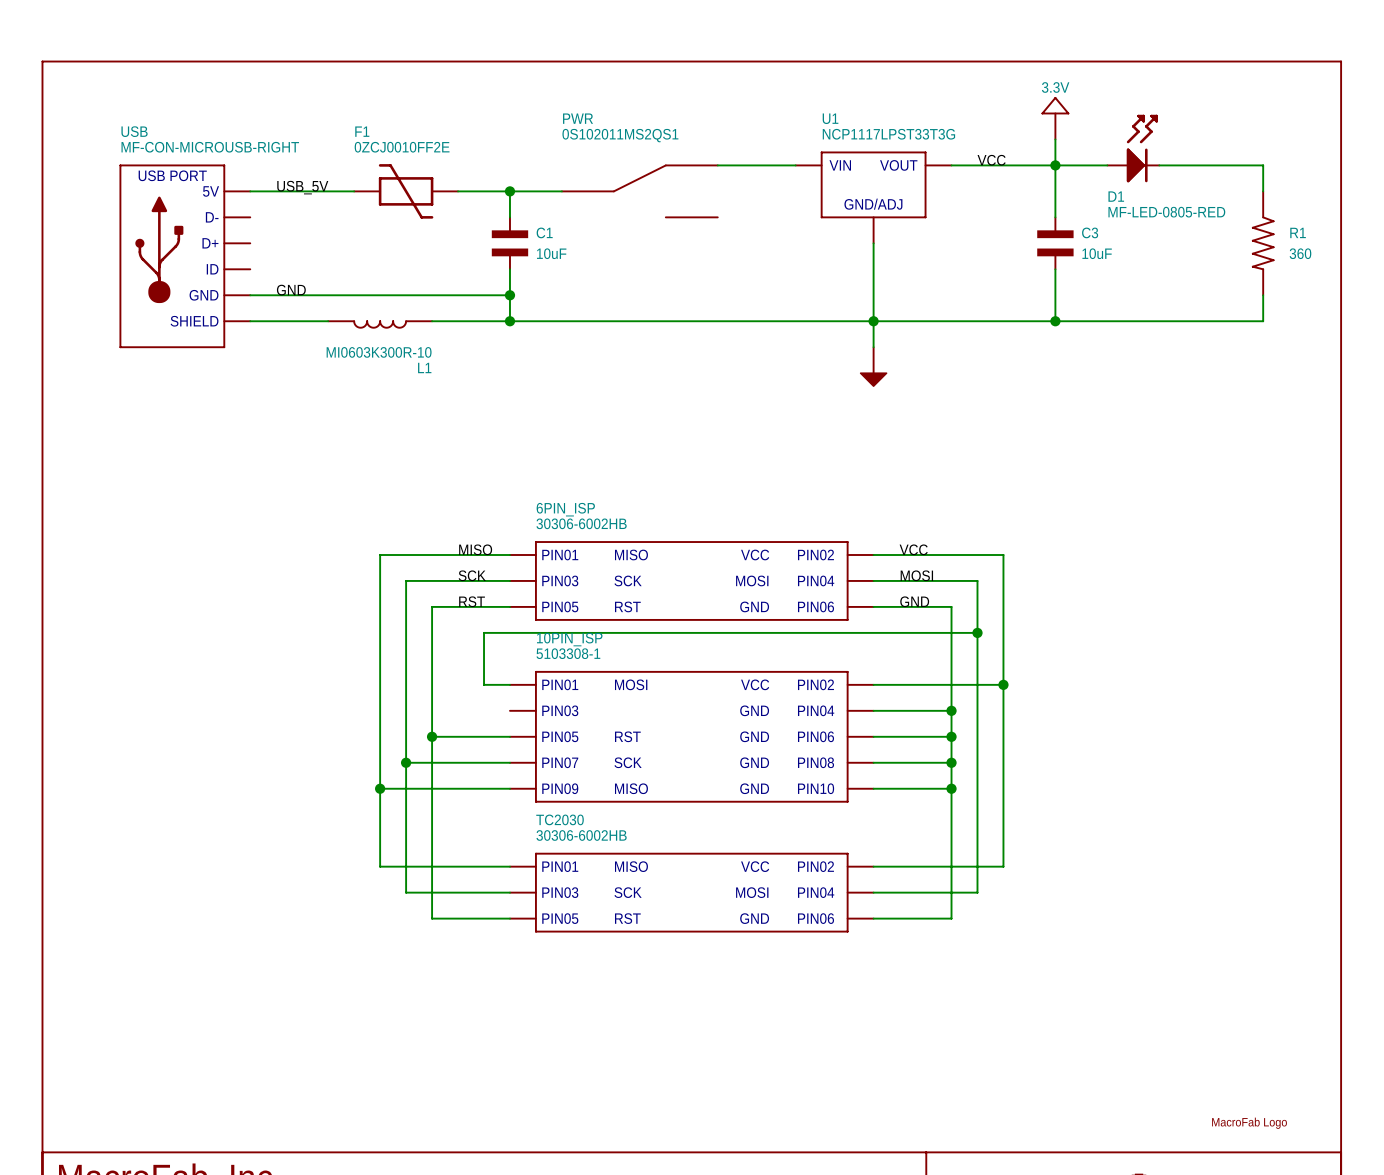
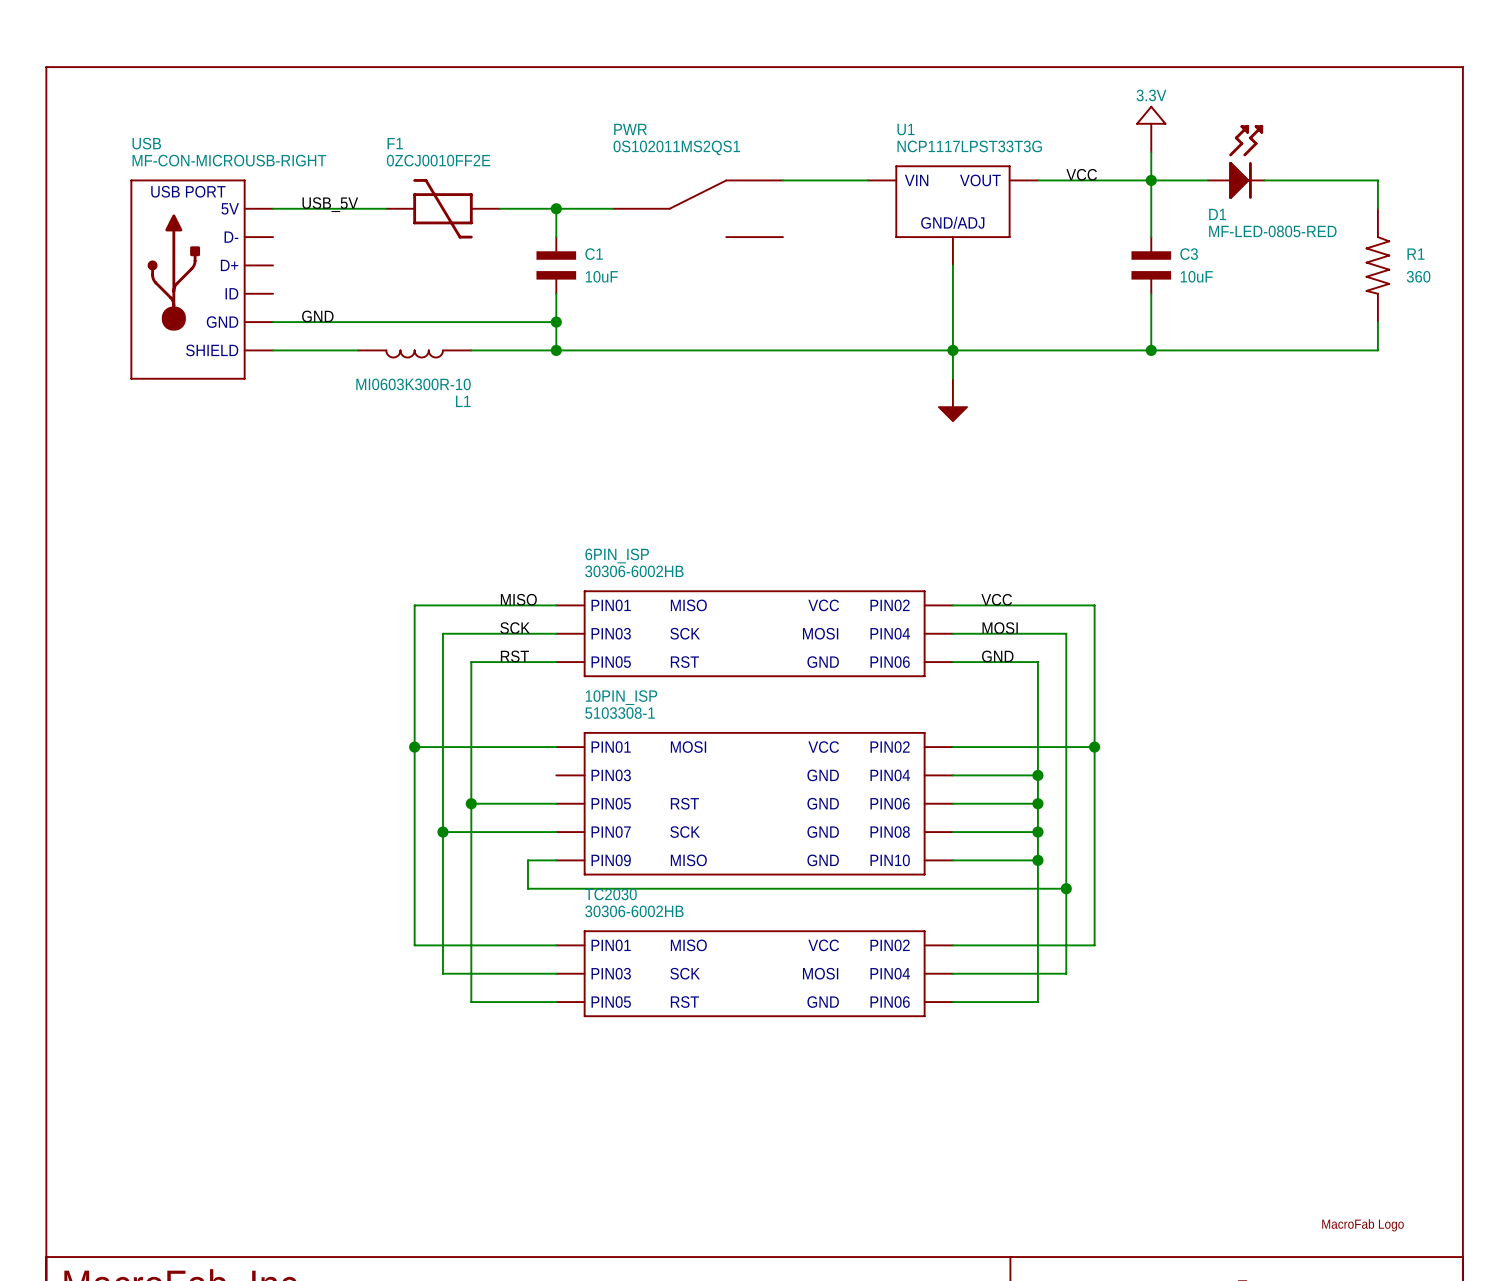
wire: (977, 632) (484, 632) (484, 684) -> (414, 747) (527, 747)
junction: (977, 632) -> none
junction: none -> (414, 747)
wire: (380, 788) (484, 788) -> (1066, 888) (527, 888) (527, 860)
junction: (380, 788) -> none
junction: none -> (1066, 888)

